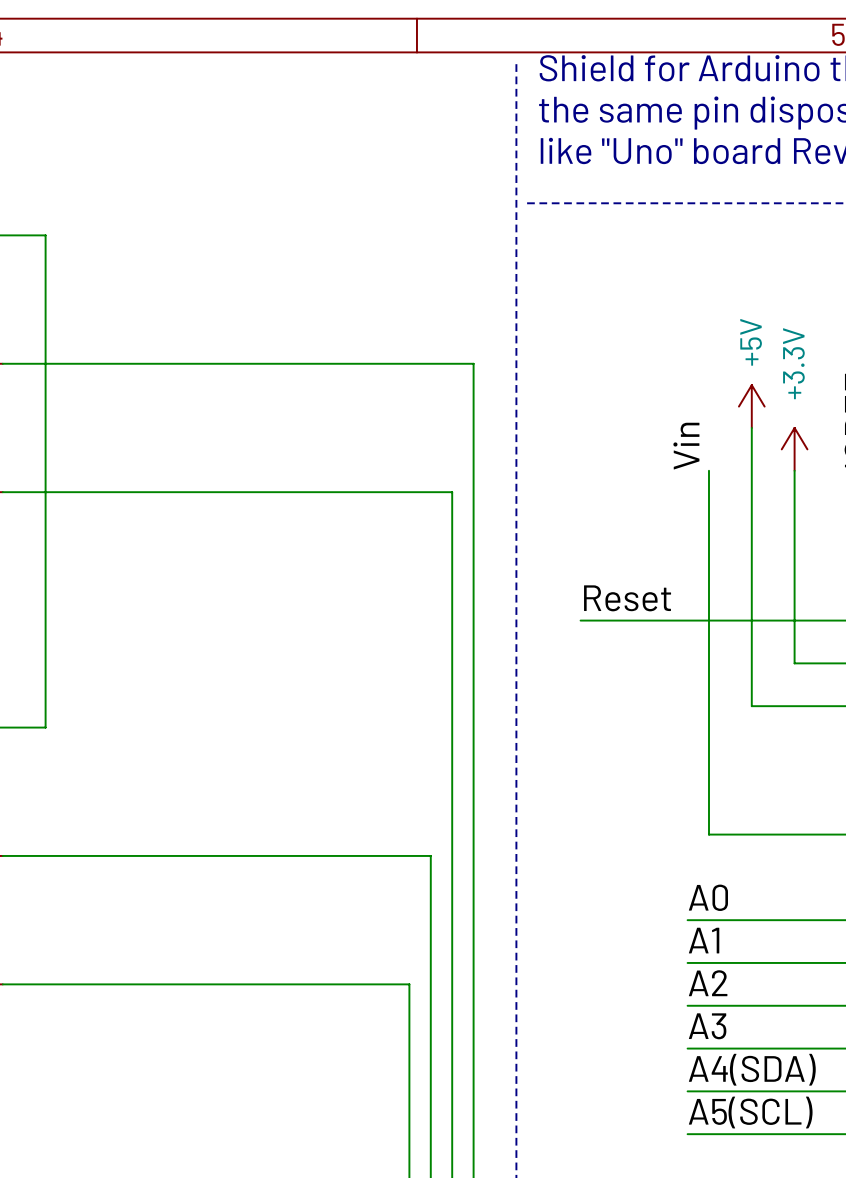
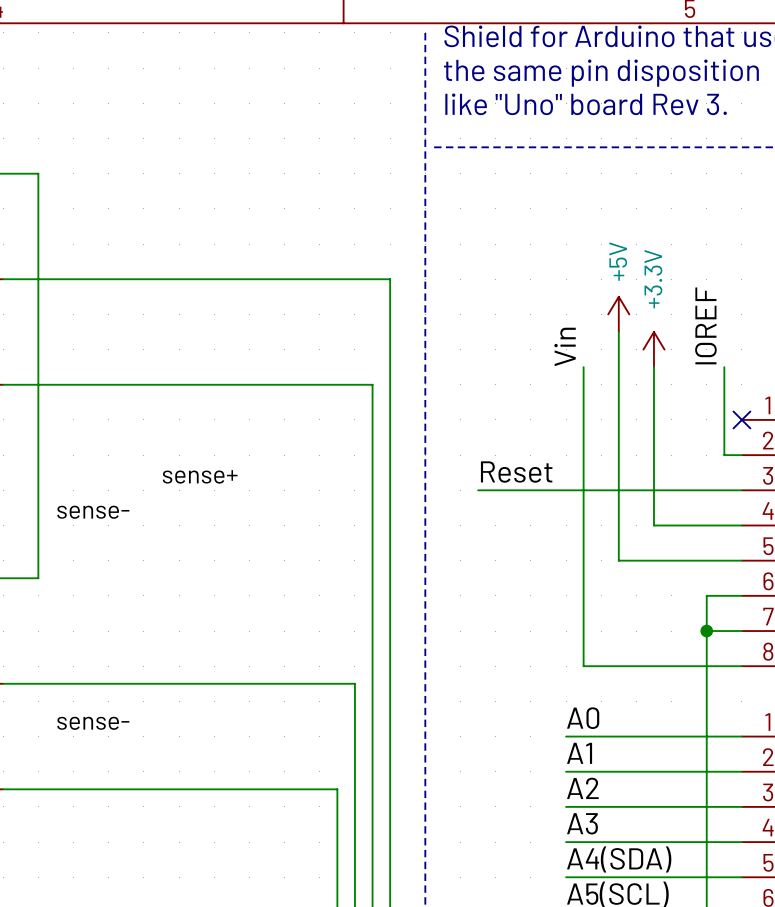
label: none -> sense+ (200, 476)
label: none -> sense- (93, 512)
label: none -> sense- (93, 723)

